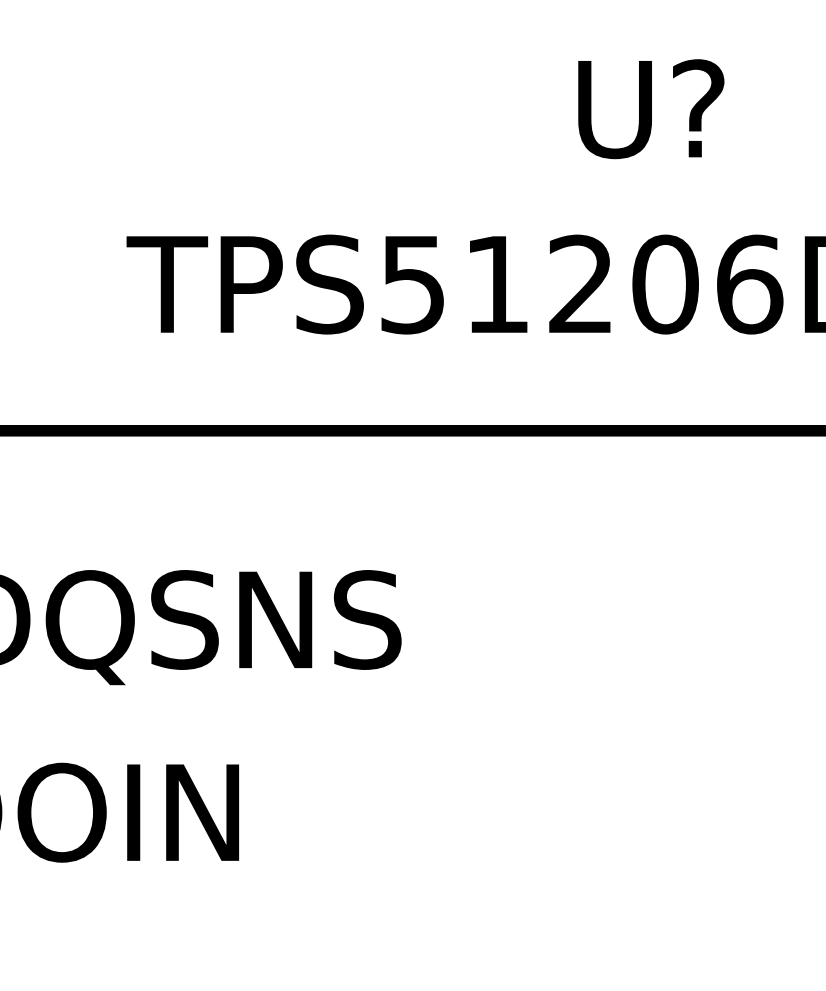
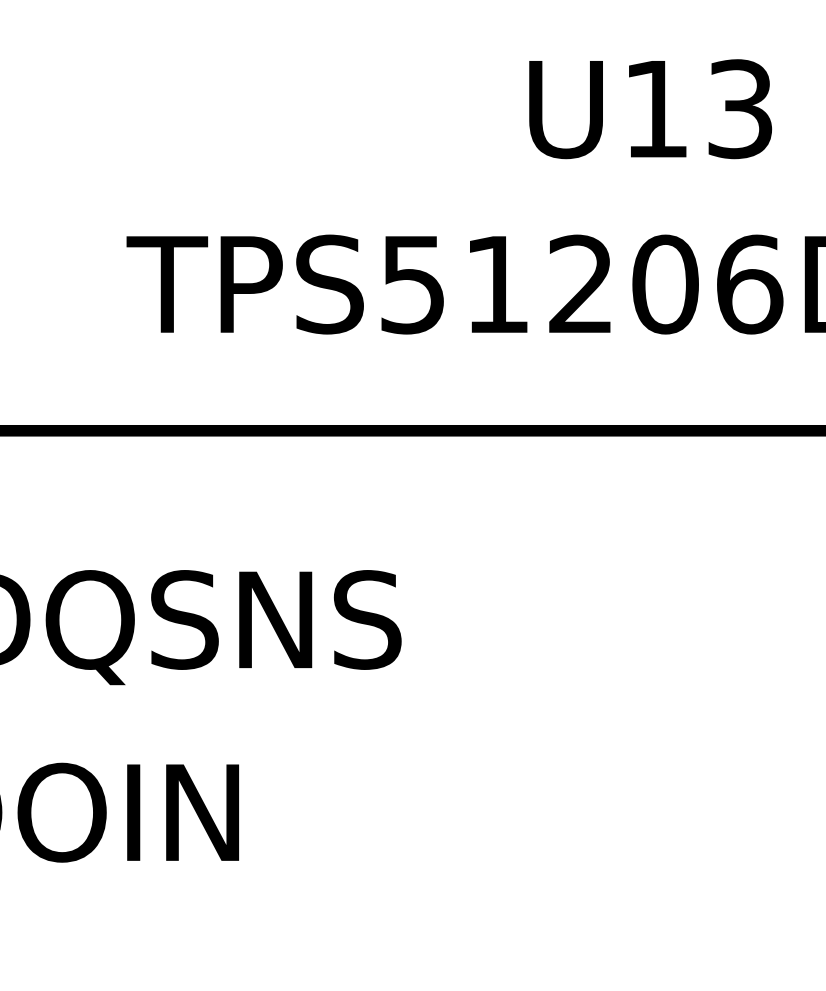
U? name: U? (651, 109) -> U13 (650, 109)

